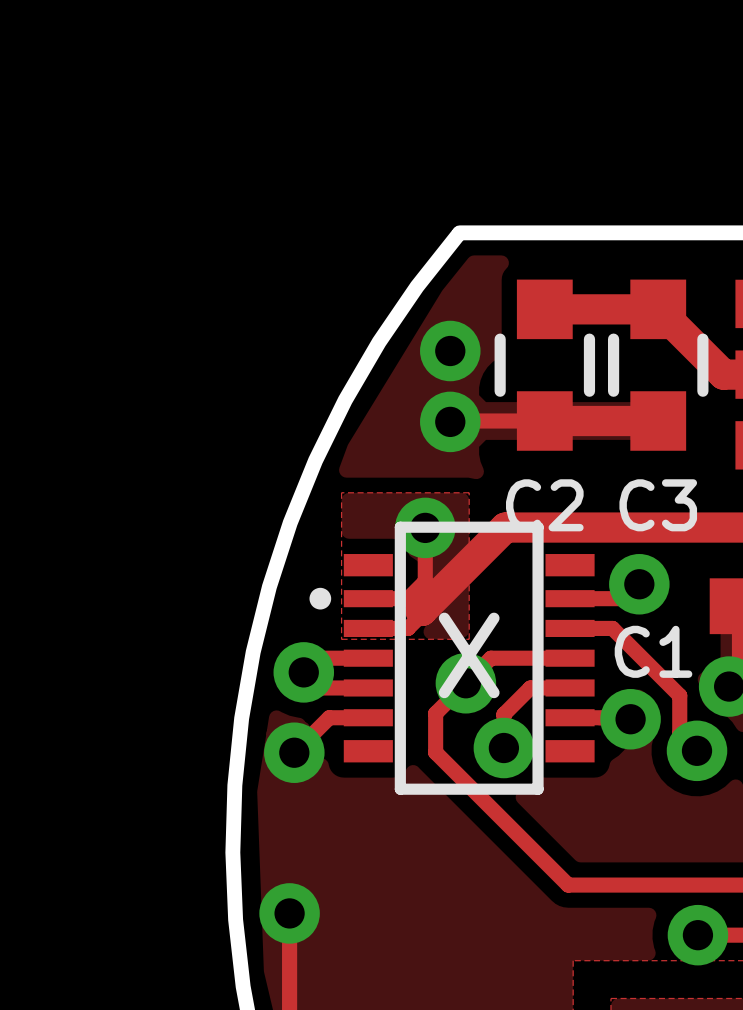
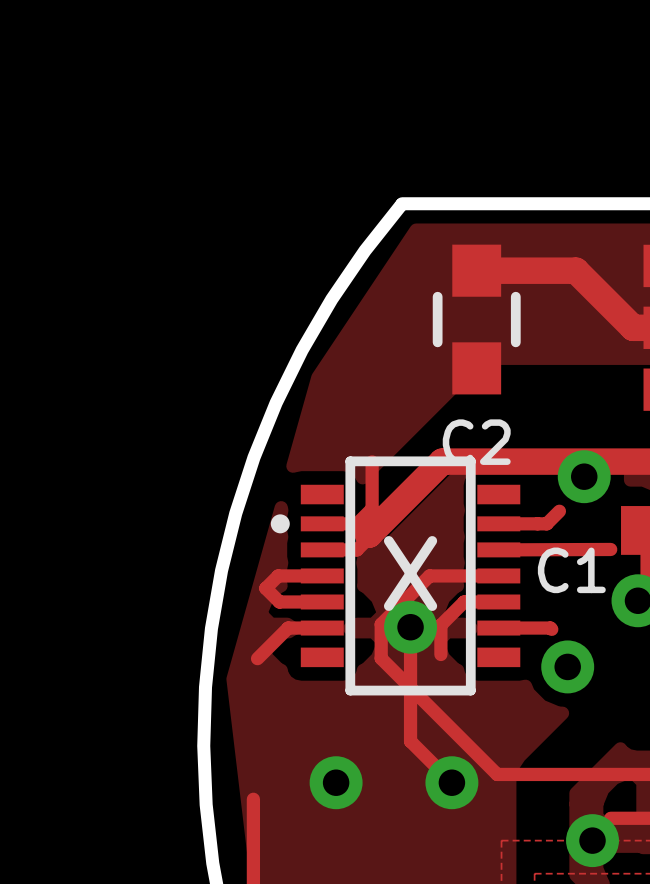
via: (450, 351) -> none
C3: (658, 365) -> none
via: (450, 421) -> none
track: (451, 421) (658, 421) -> none
zone outline: (341, 492) (469, 492) (469, 639) (341, 639) (341, 492) -> none
via: (425, 527) -> none
via position: (639, 584) -> (584, 476)
track: none -> (610, 549) (503, 549)
track: (570, 628) (612, 628) (679, 695) (679, 733) (697, 750) -> none
via: (303, 672) -> none
via: (465, 683) -> none
track: none -> (410, 627) (410, 741) (451, 782)
via: none -> (410, 627)
via: (630, 719) -> none
via: (503, 748) -> none
via: (697, 750) -> none
via: (294, 752) -> none
via: none -> (567, 666)
via: none -> (336, 782)
via: none -> (451, 782)
via: (289, 913) -> none
via position: (697, 935) -> (592, 840)

